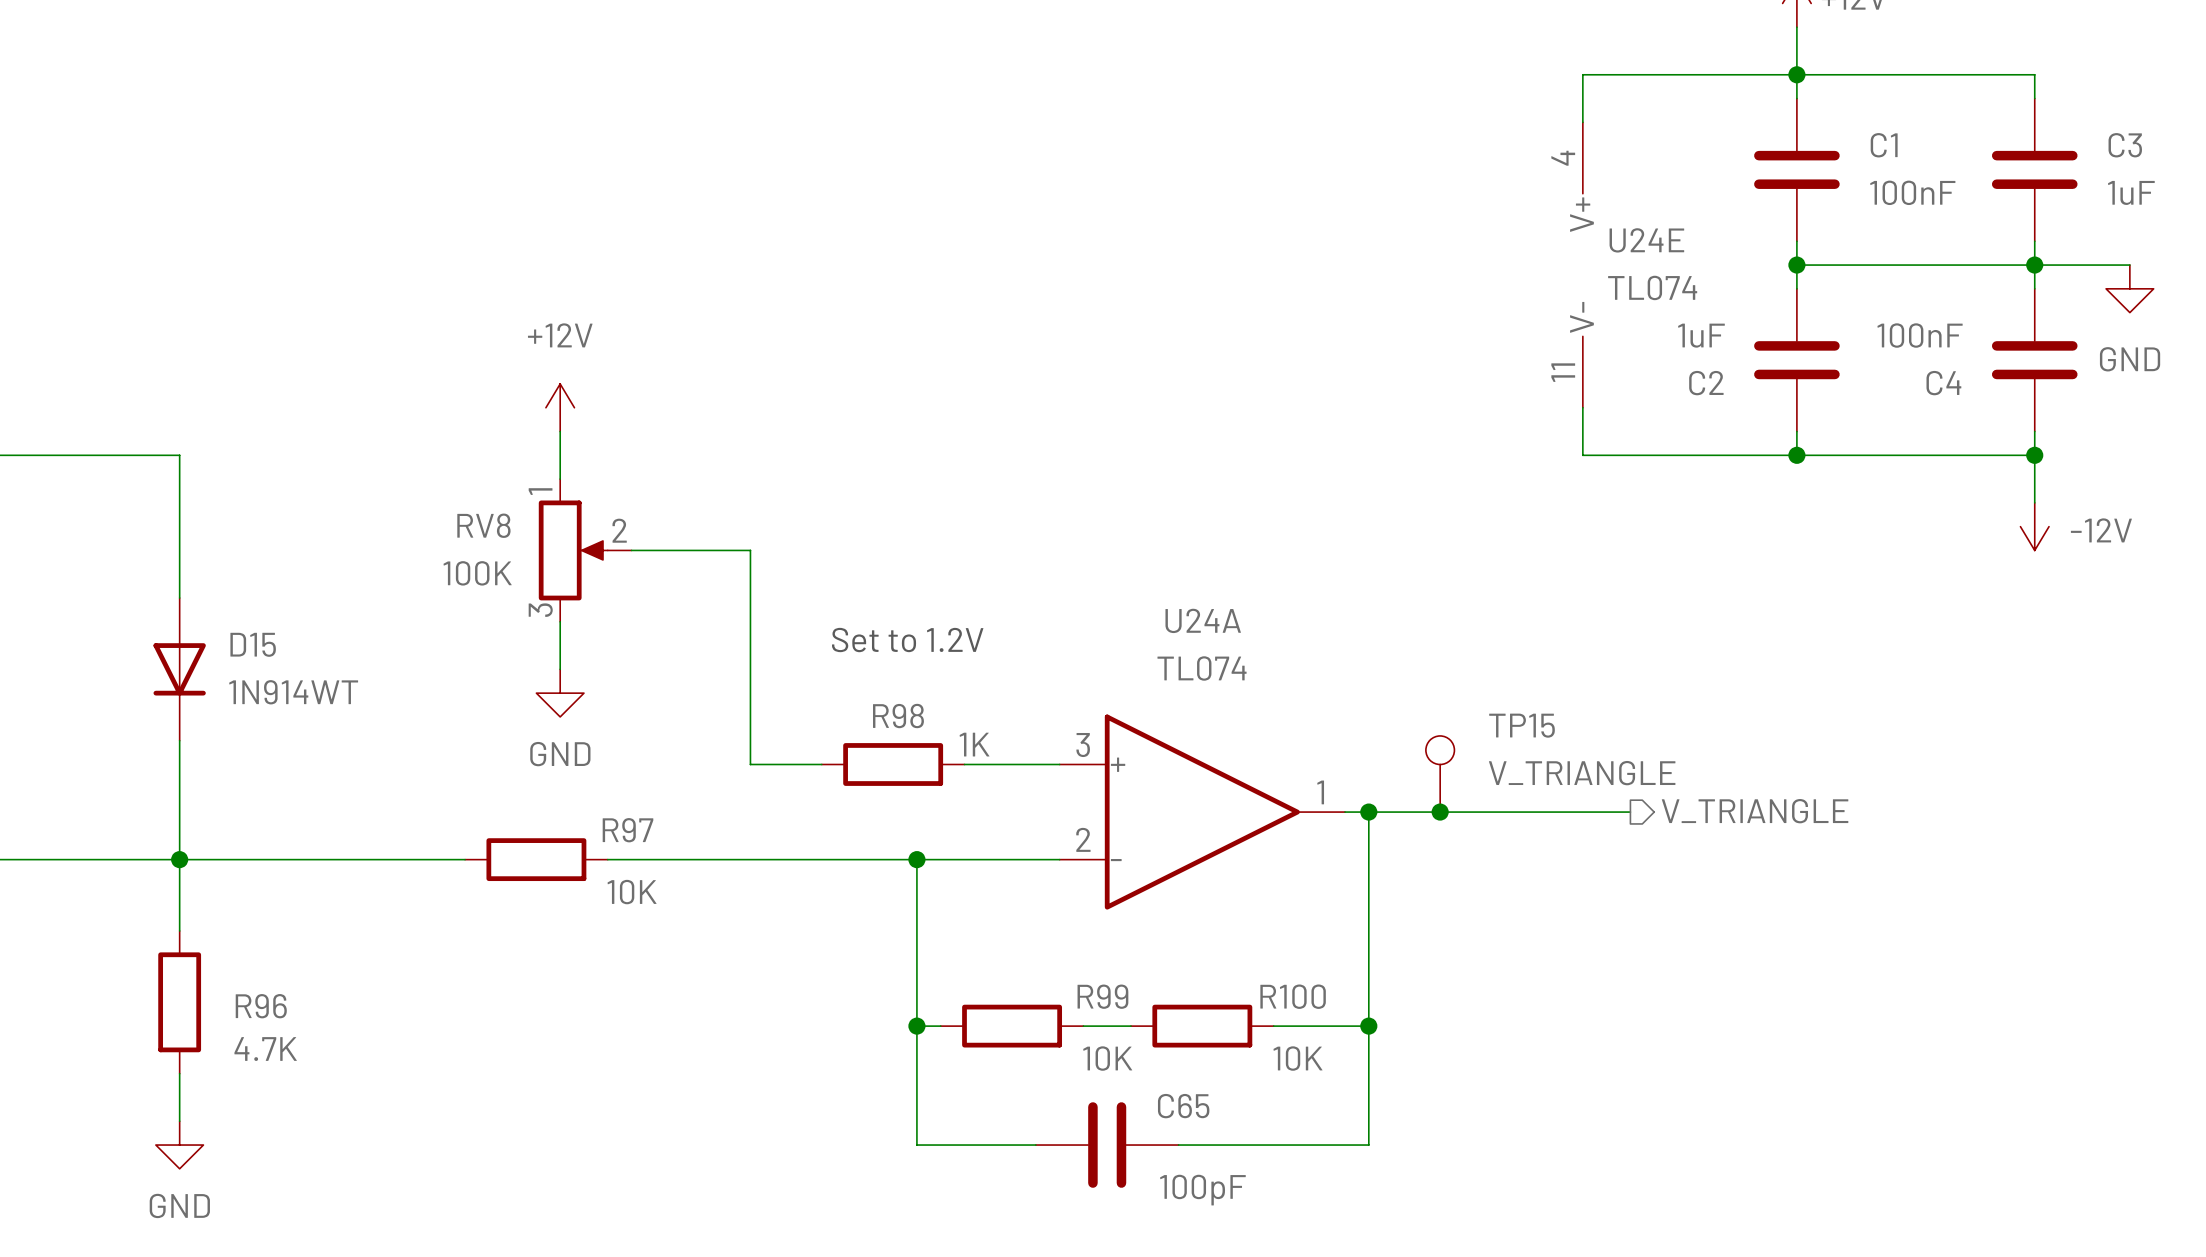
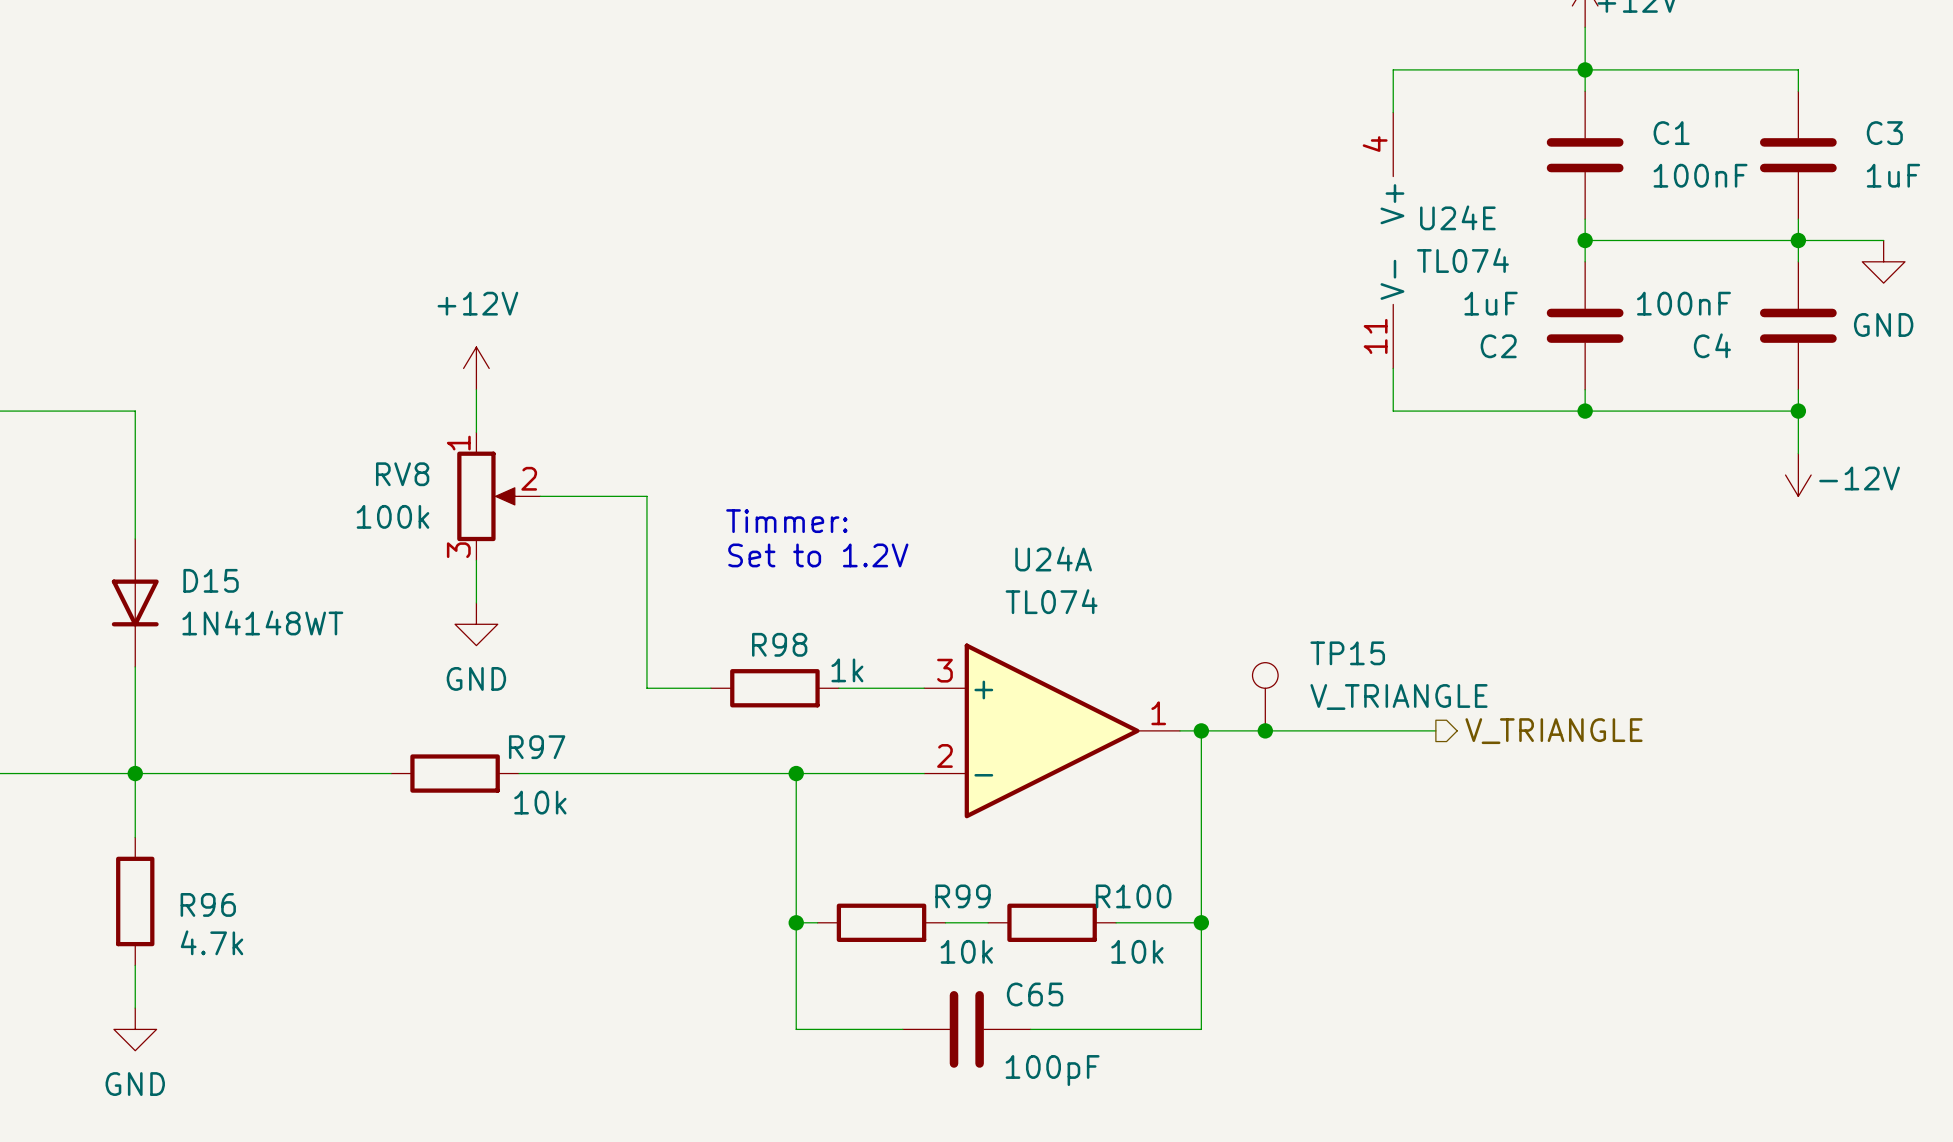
RV8 value: 100K (477, 573) -> 100k (392, 516)
text: none -> Timmer: (786, 521)
text position: Set to 1.2V (907, 640) -> Set to 1.2V (818, 555)
D15 value: 1N914WT (293, 692) -> 1N4148WT (262, 622)
R98 value: 1K (974, 744) -> 1k (847, 670)
R97 value: 10K (632, 892) -> 10k (540, 802)
R96 value: 4.7K (265, 1049) -> 4.7k (212, 942)
R99 value: 10K (1107, 1058) -> 10k (966, 951)
R100 value: 10K (1297, 1058) -> 10k (1137, 951)

